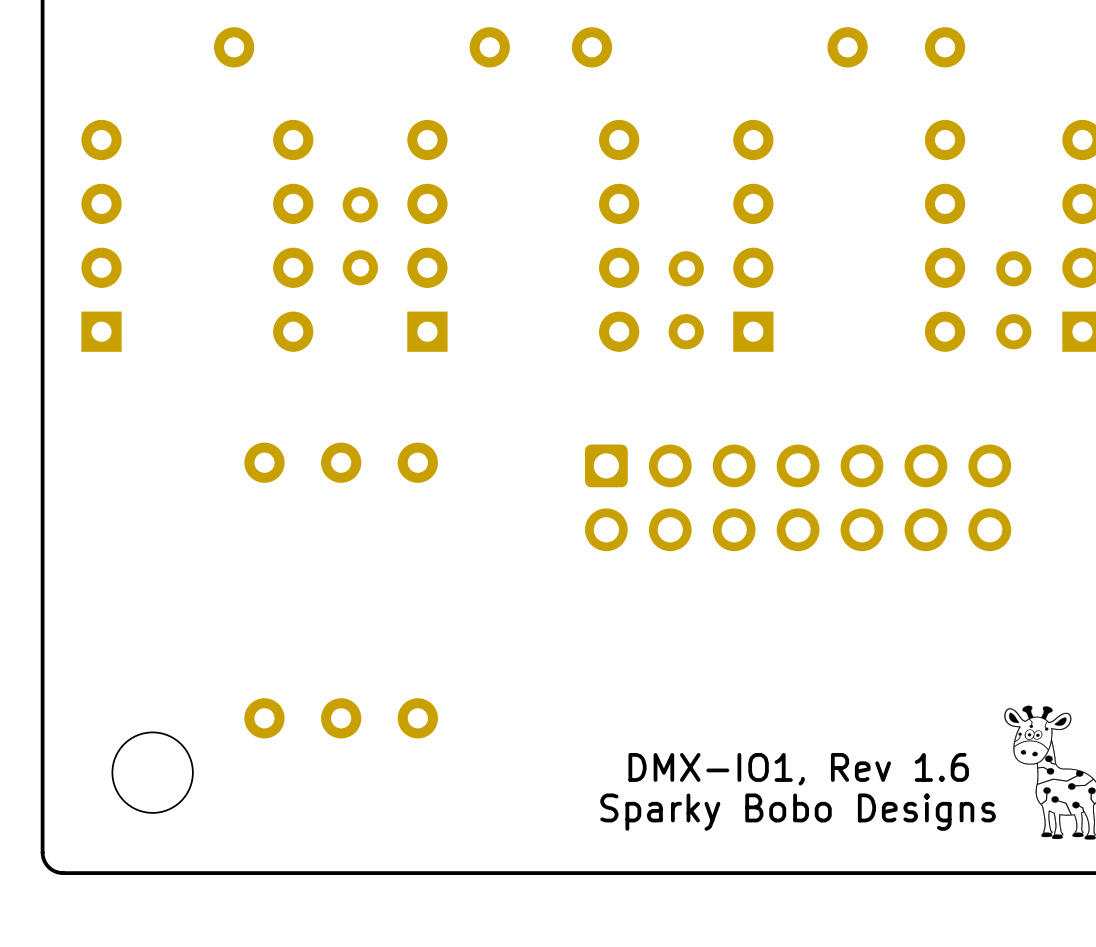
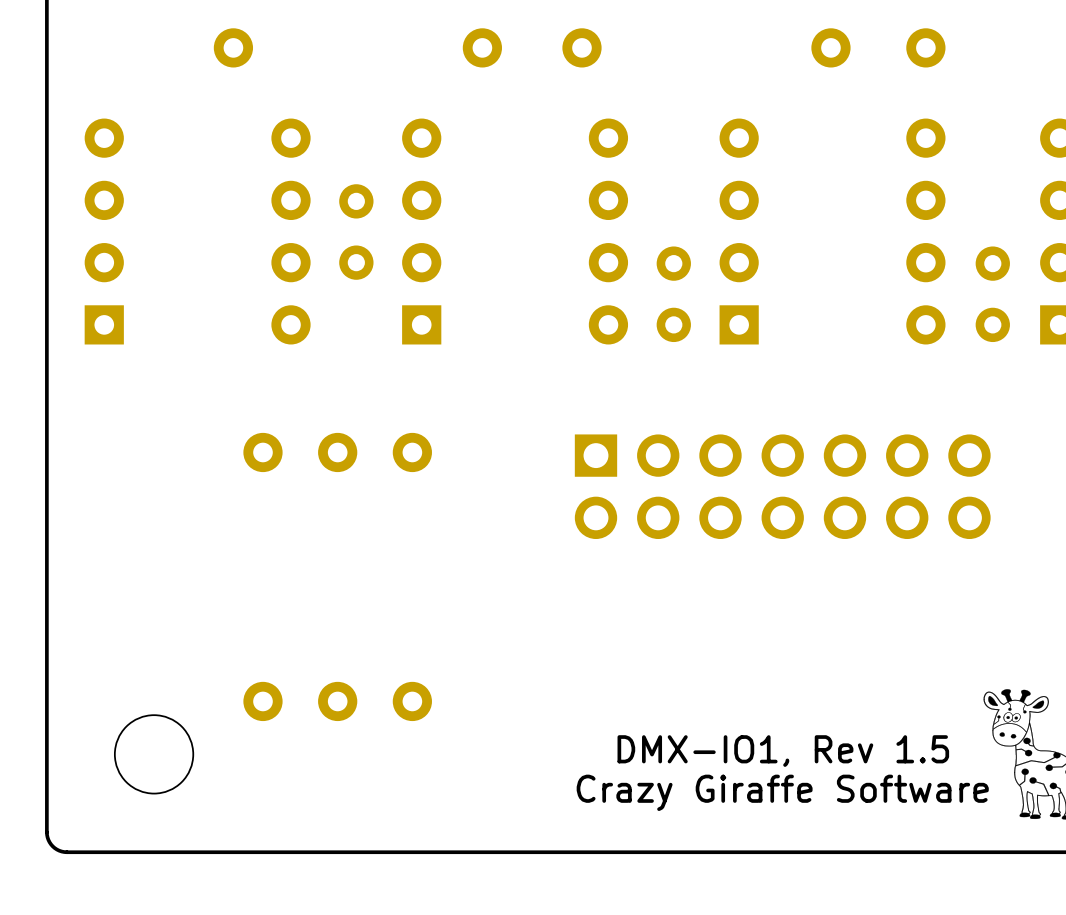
part footprint: [584, 444, 1012, 552] -> [574, 434, 991, 540]
text: DMX-IO1, Rev 1.6 (798, 769) -> DMX-IO1, Rev 1.5 (783, 751)
text: Sparky Bobo Designs (798, 812) -> Crazy Giraffe Software (782, 792)

